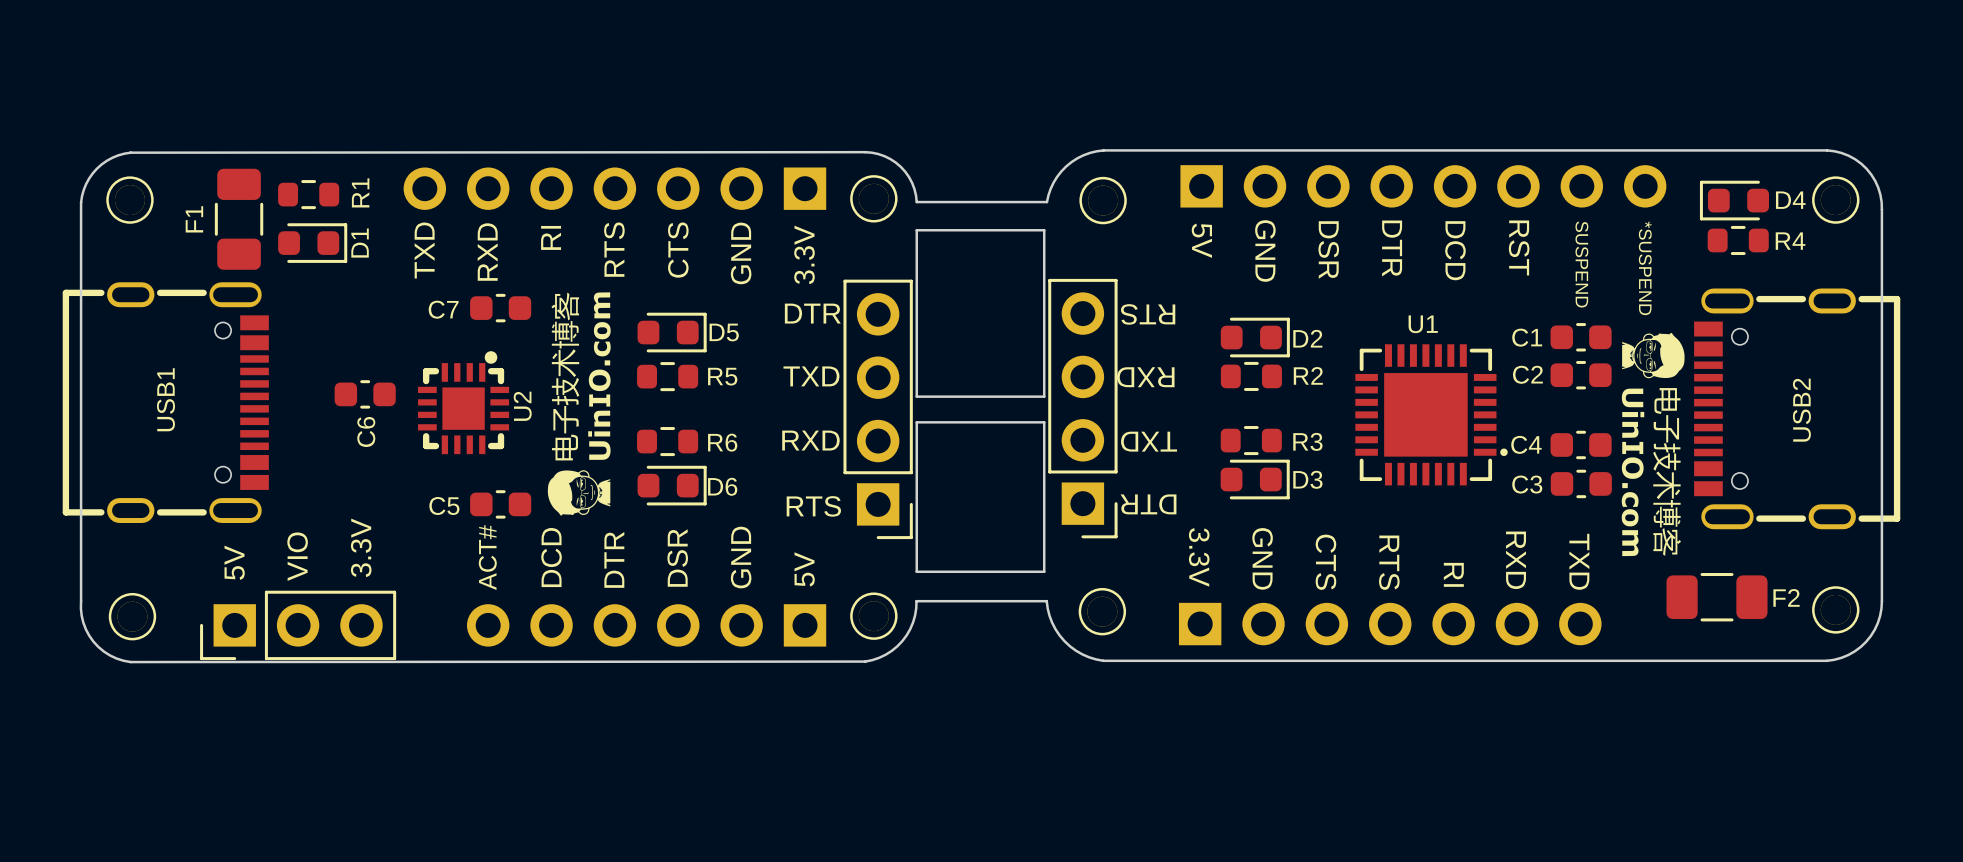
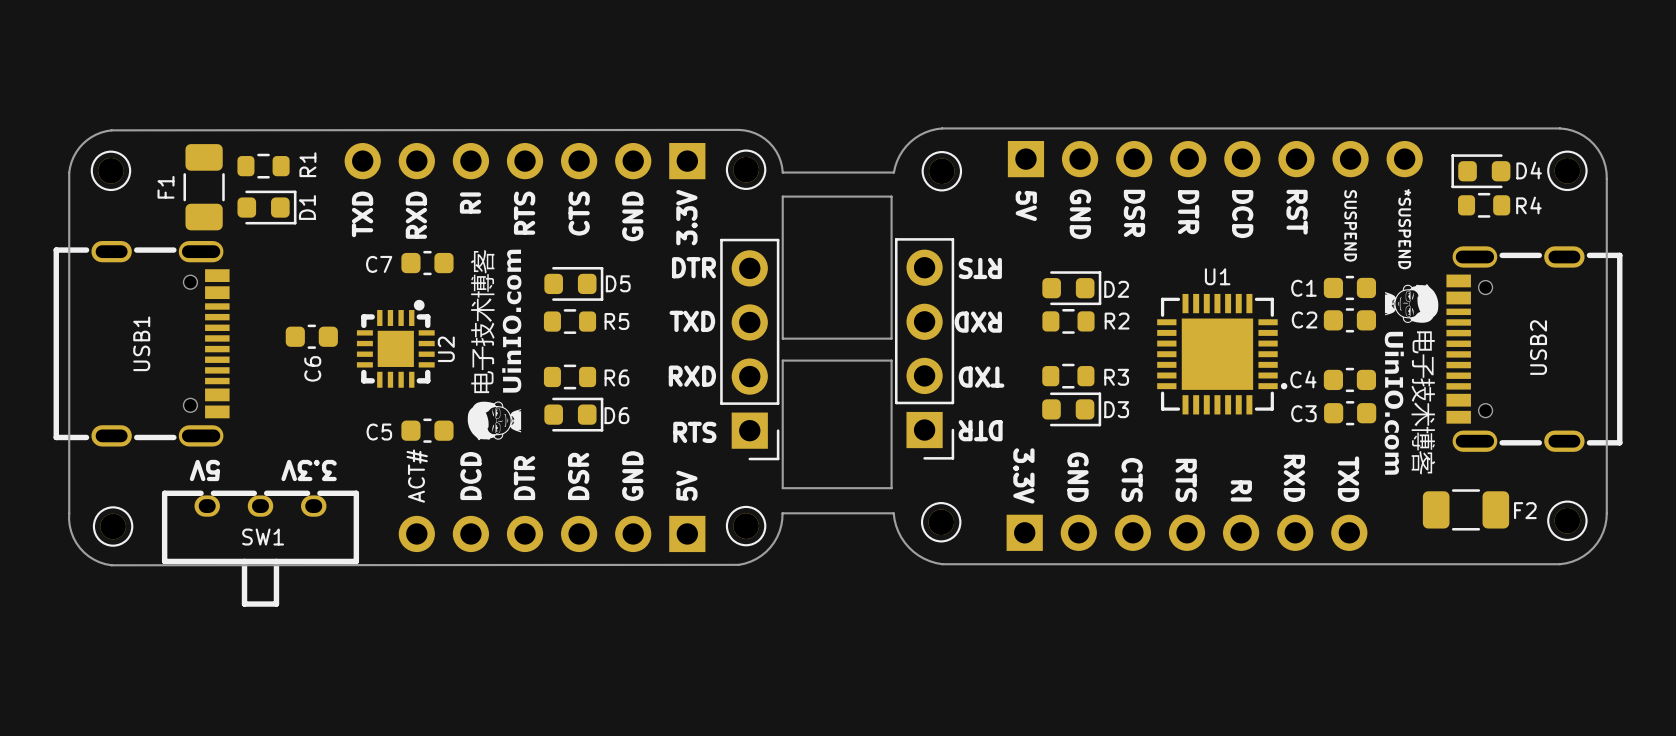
text rotation: 0° (361, 547) -> 90° counterclockwise (309, 470)
text: VIO (297, 556) -> none
text rotation: 0° (234, 562) -> 90° counterclockwise (204, 470)
part: (298, 625) -> none
SW1: none -> (260, 548)

